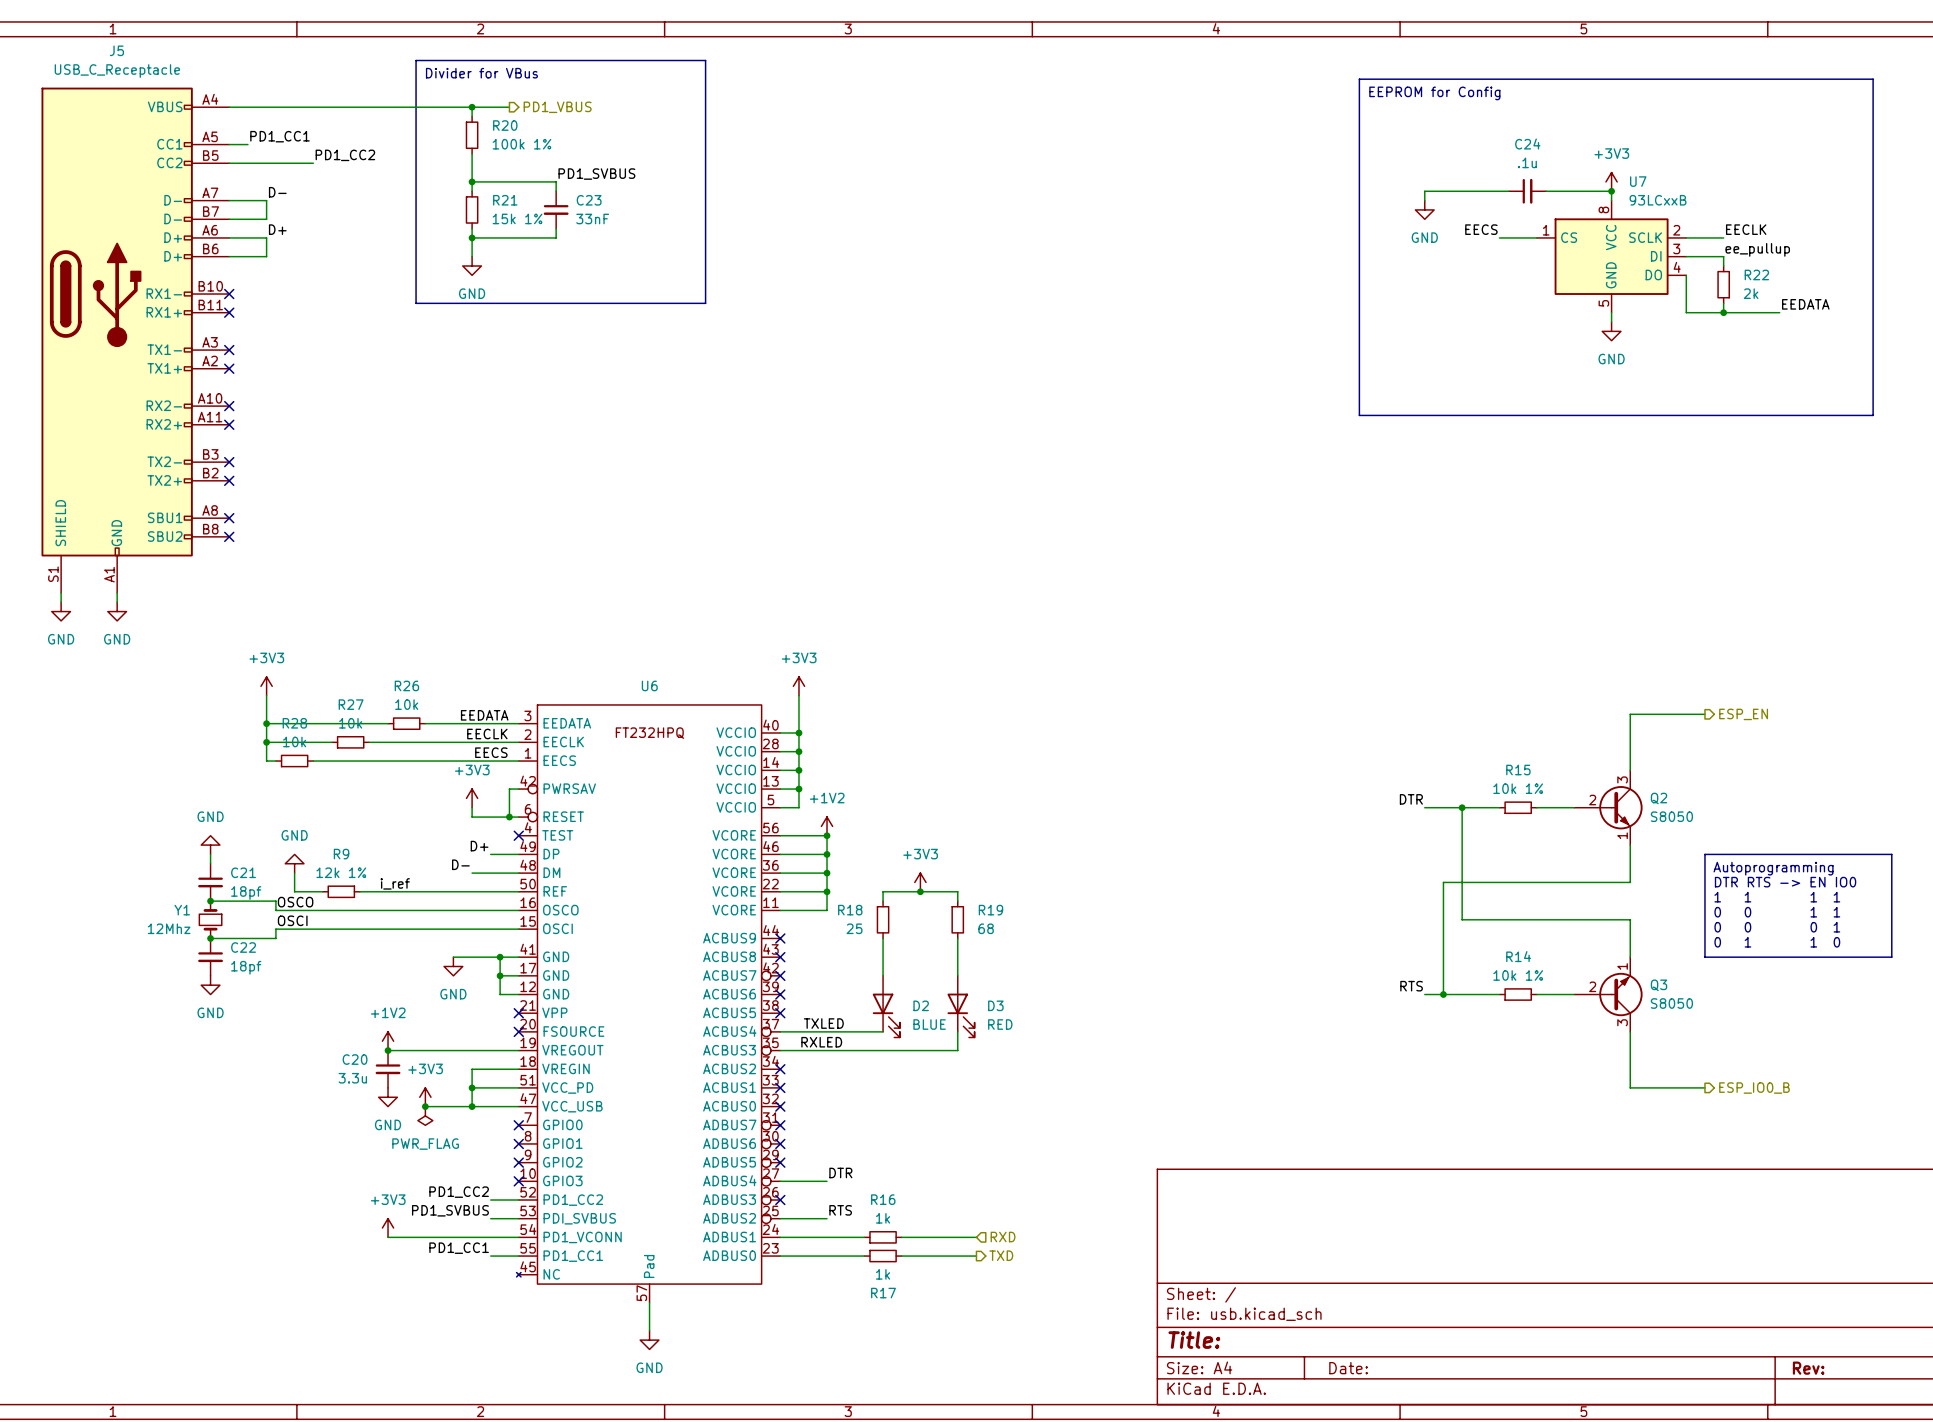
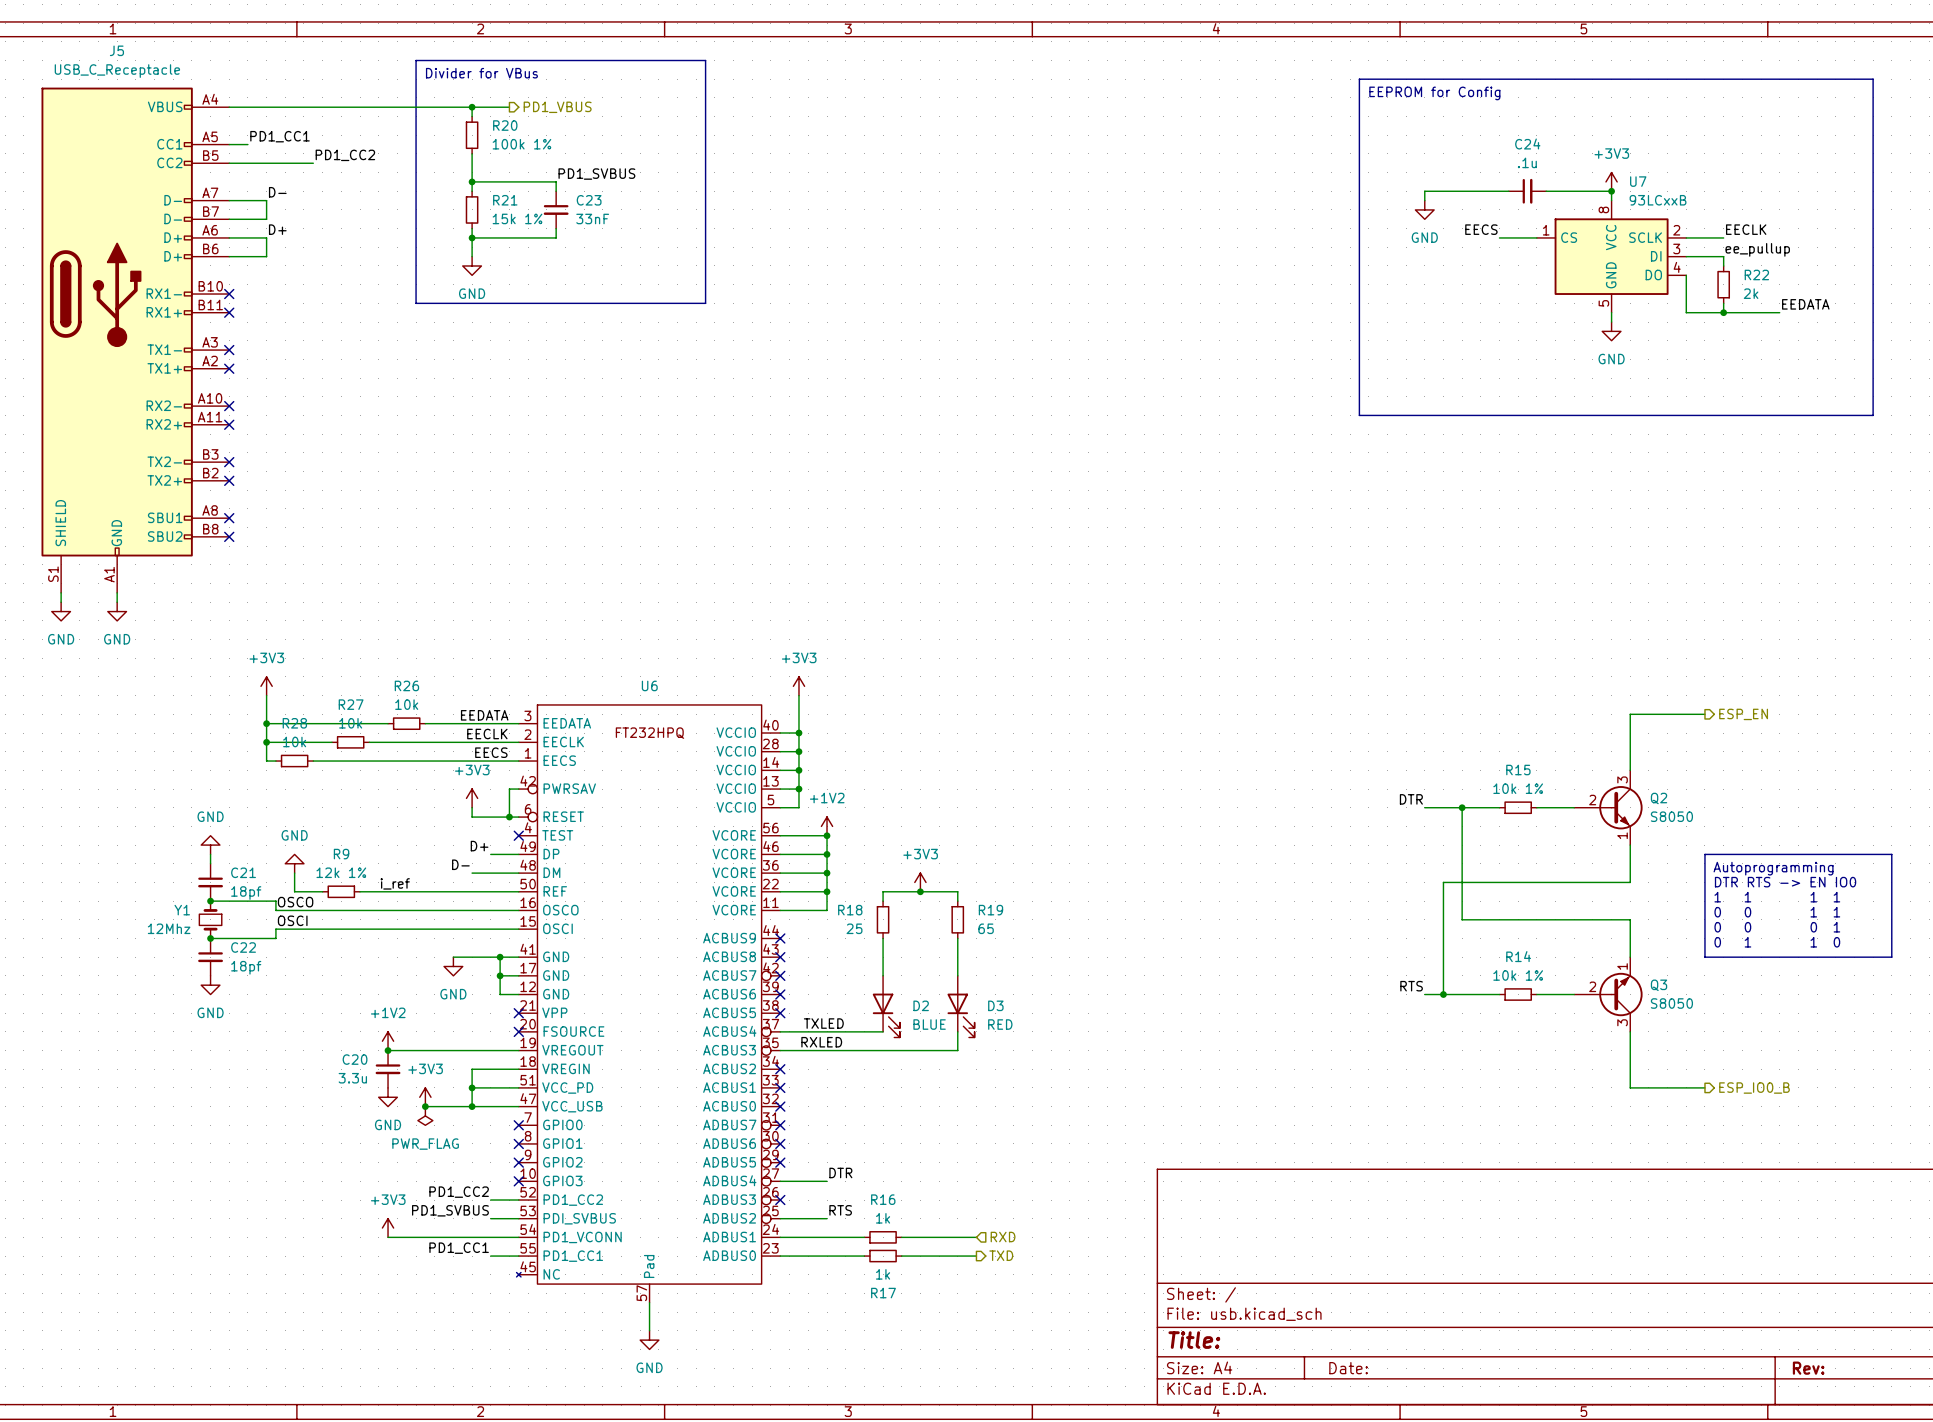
R19 value: 68 (986, 928) -> 65 (986, 928)

